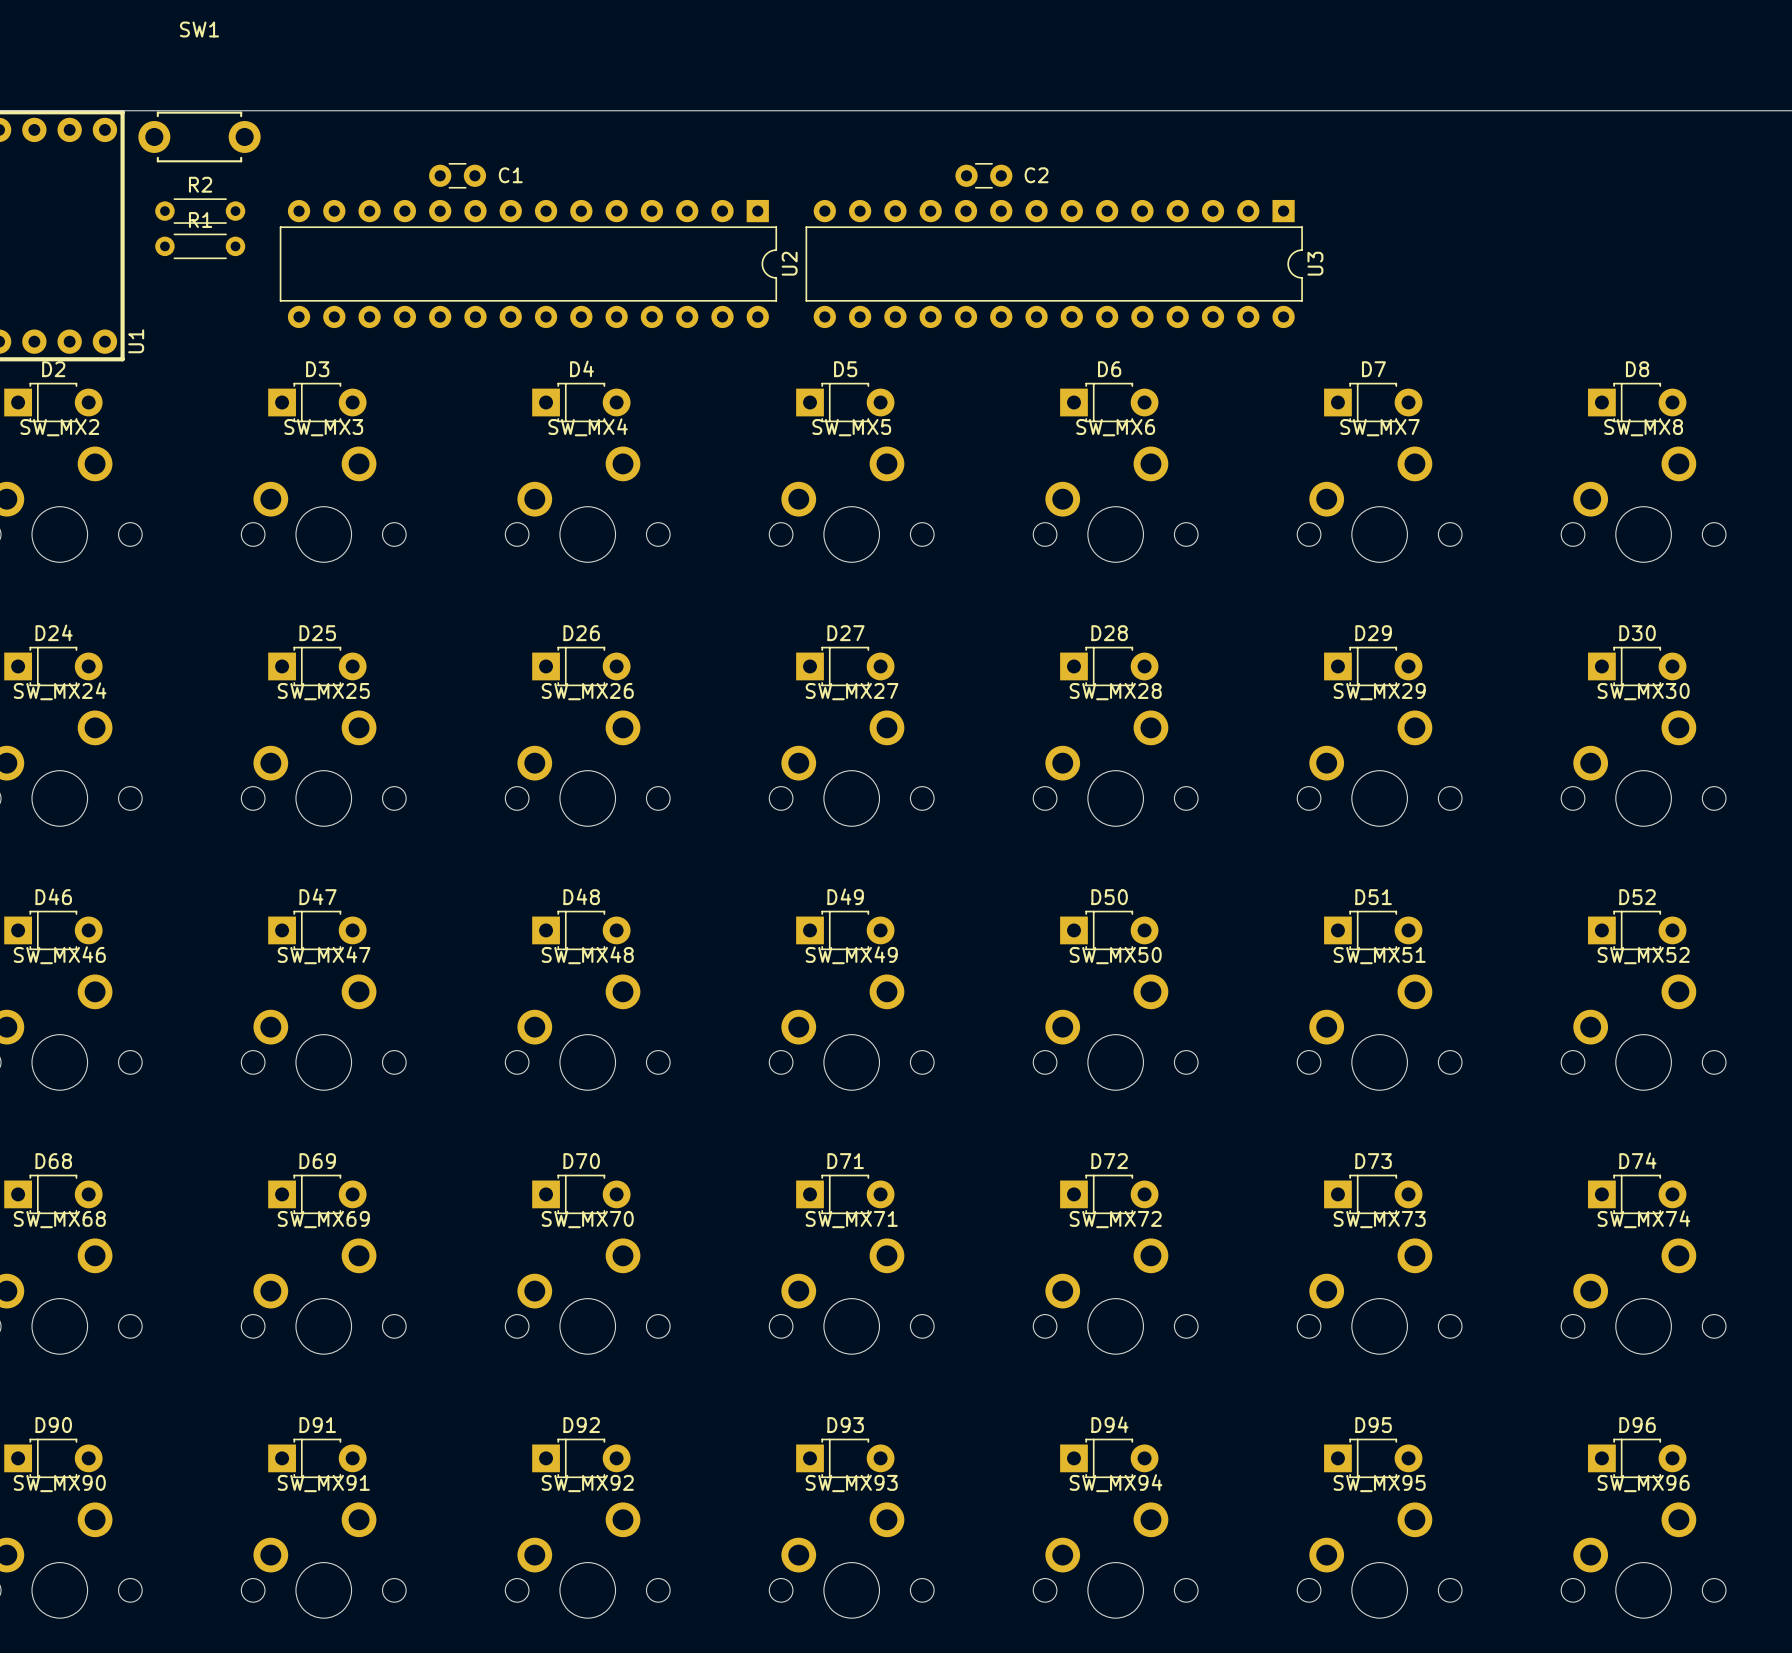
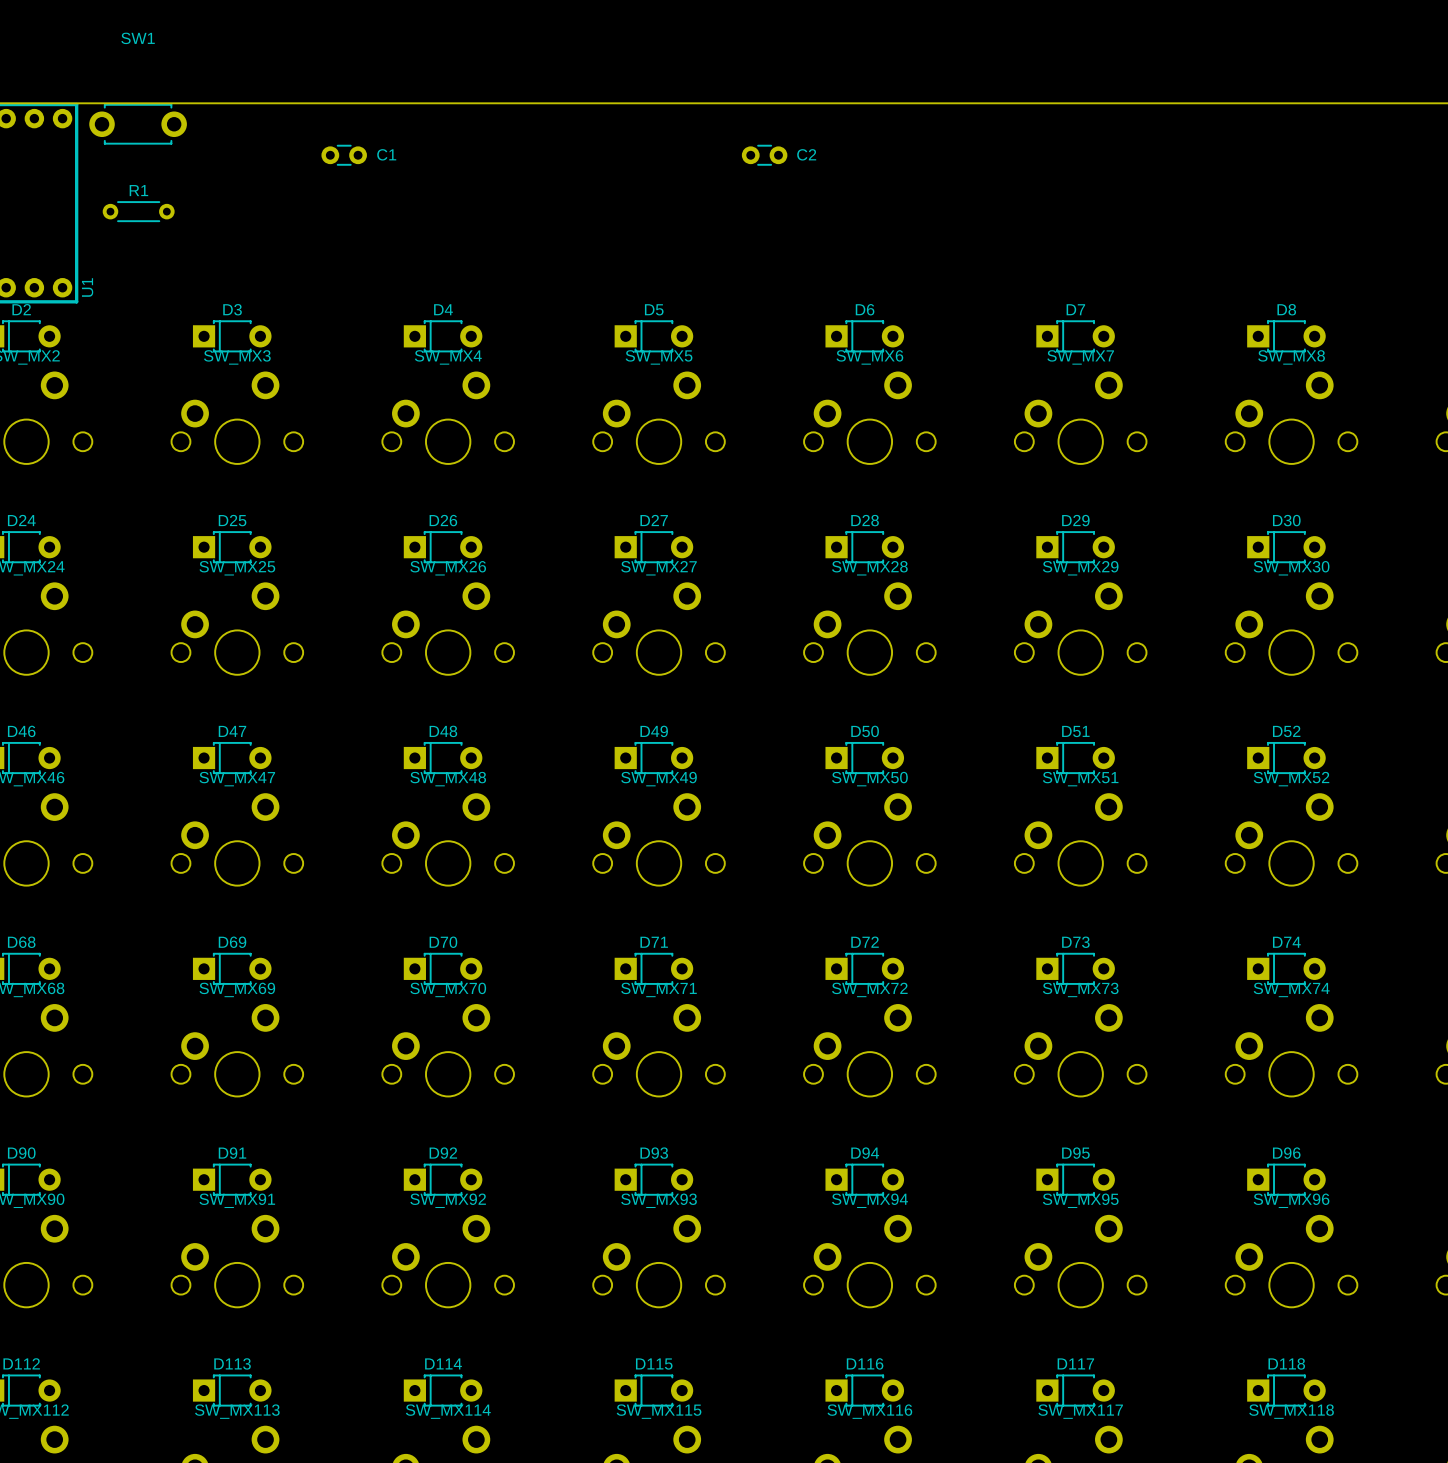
R2: (200, 211) -> none
U2: (528, 264) -> none
U3: (1054, 264) -> none

